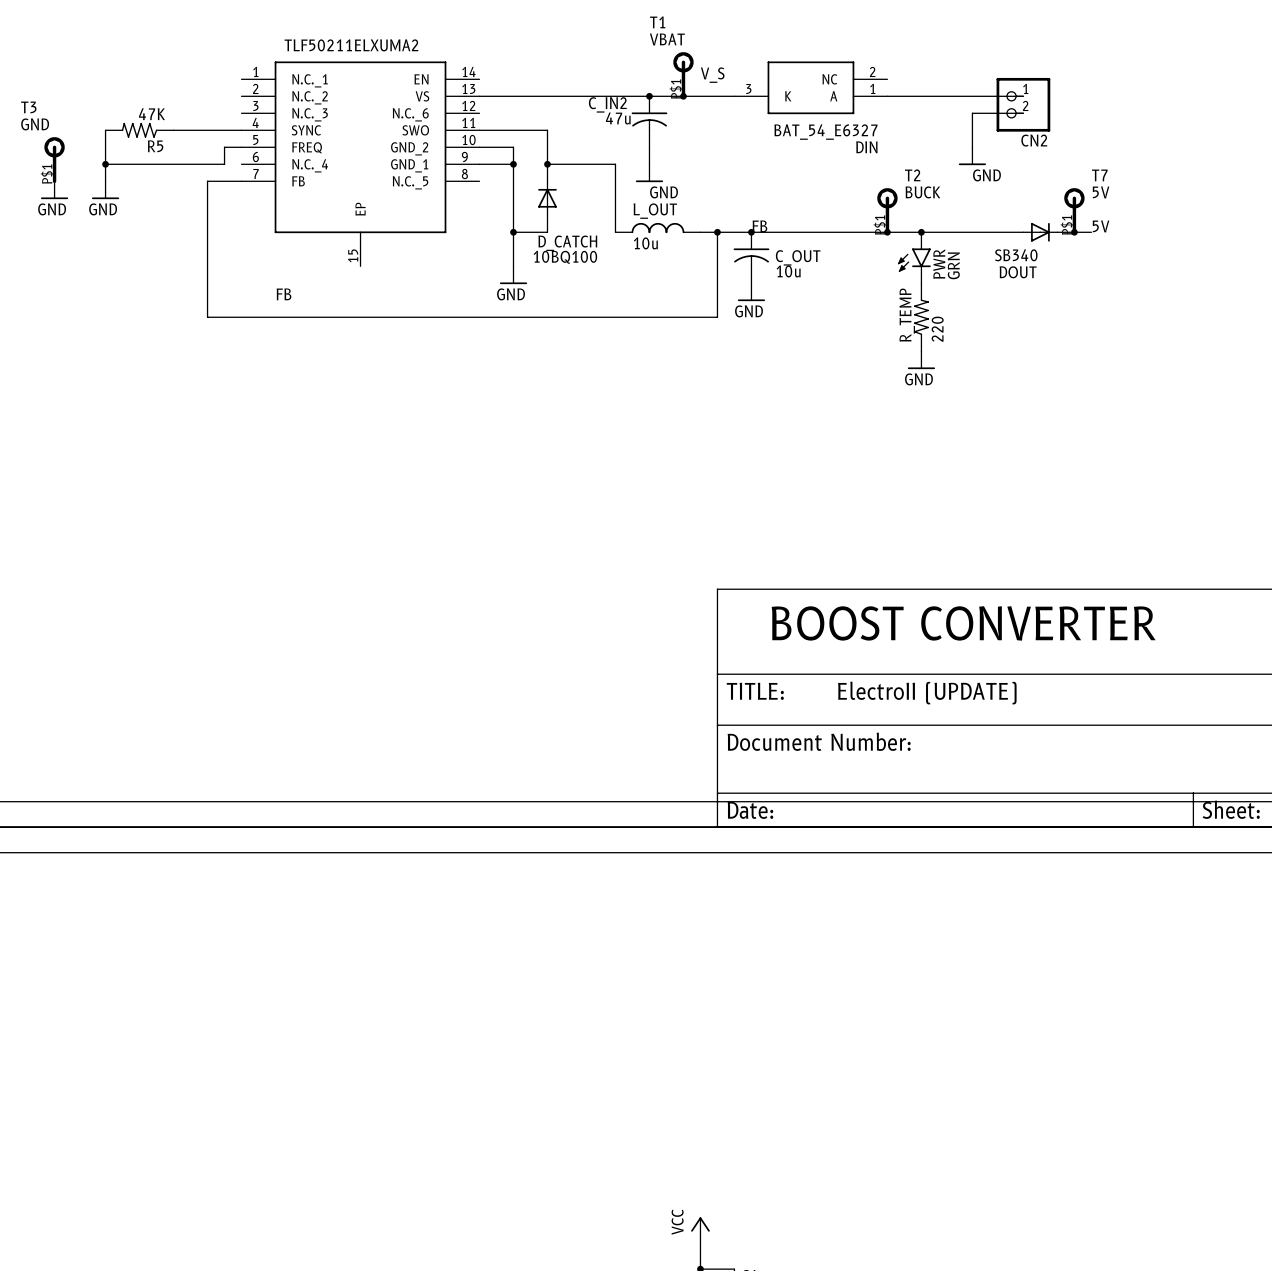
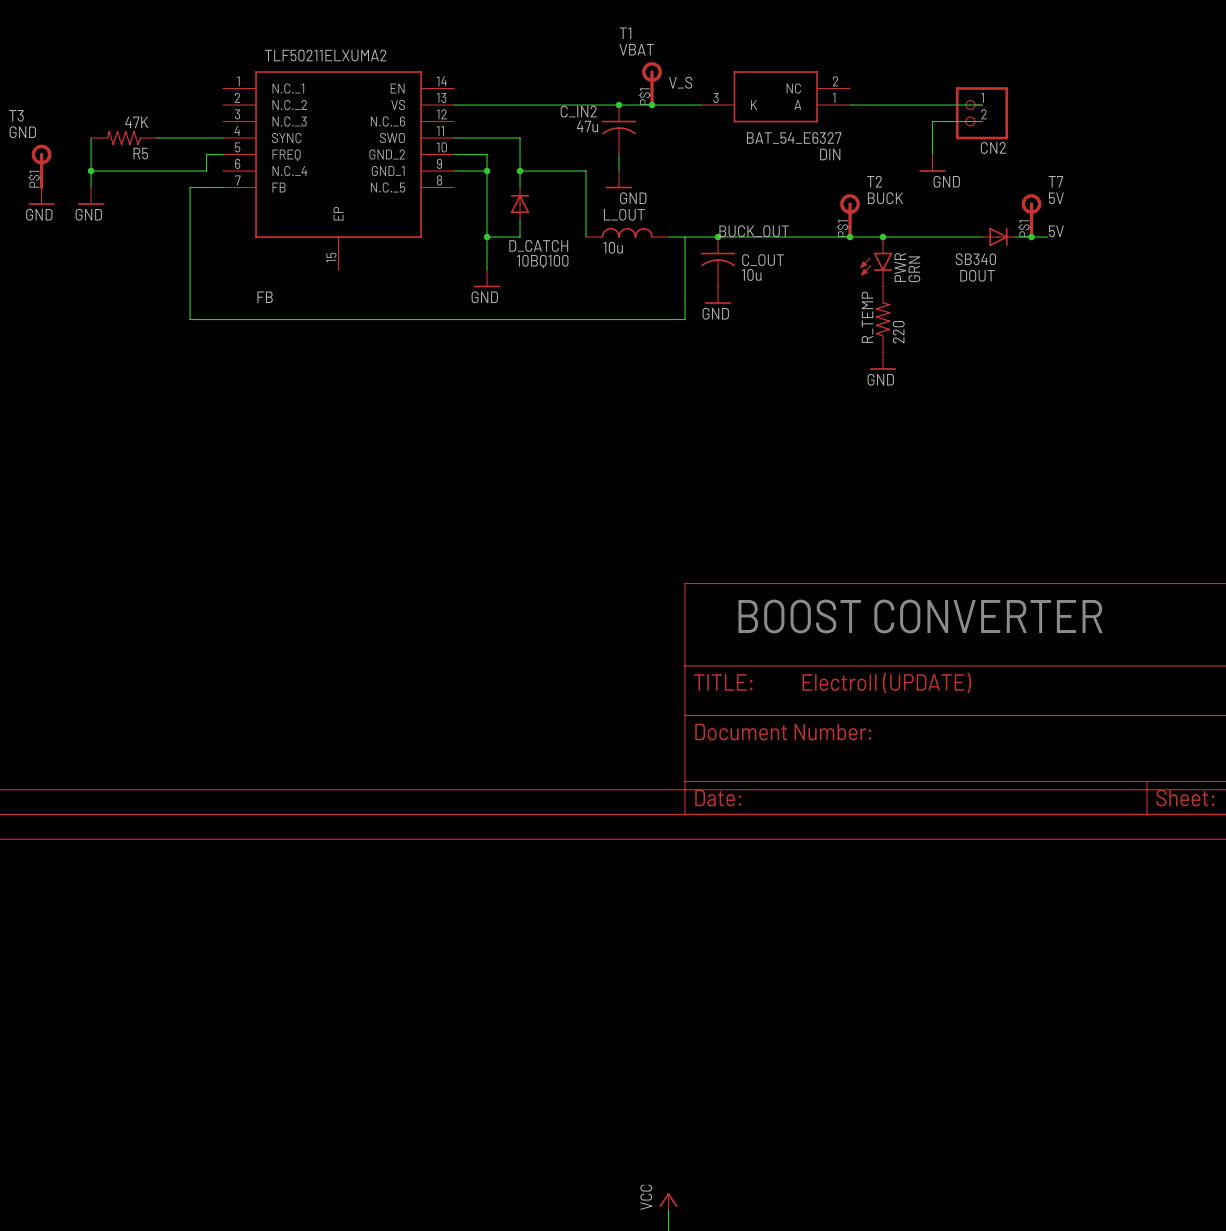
label: FB (759, 226) -> BUCK_OUT (754, 231)
junction: (717, 232) -> none

